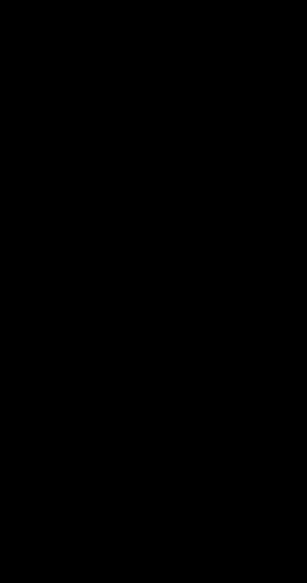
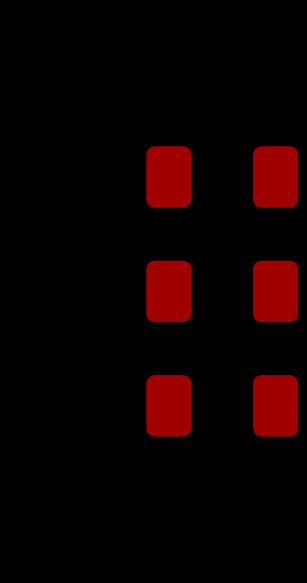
part: none -> (222, 177)
part: none -> (222, 291)
part: none -> (222, 405)

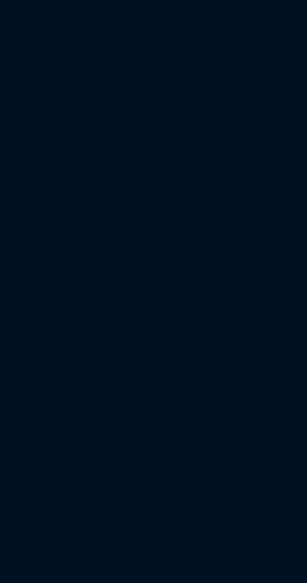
part: (222, 177) -> none
part: (222, 291) -> none
part: (222, 405) -> none

